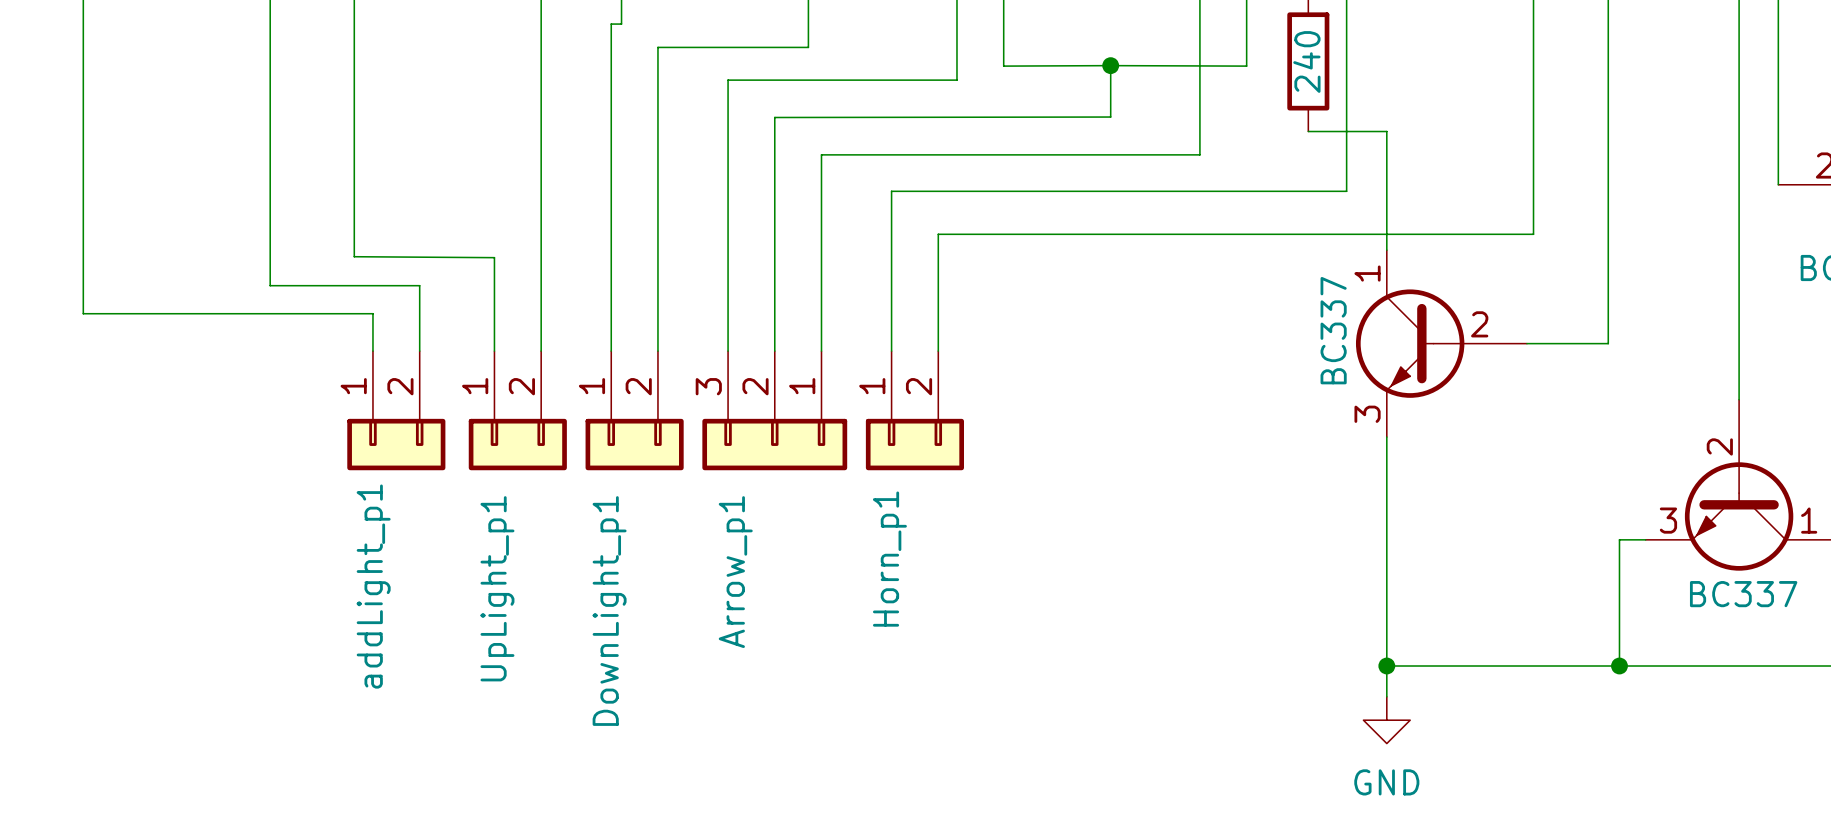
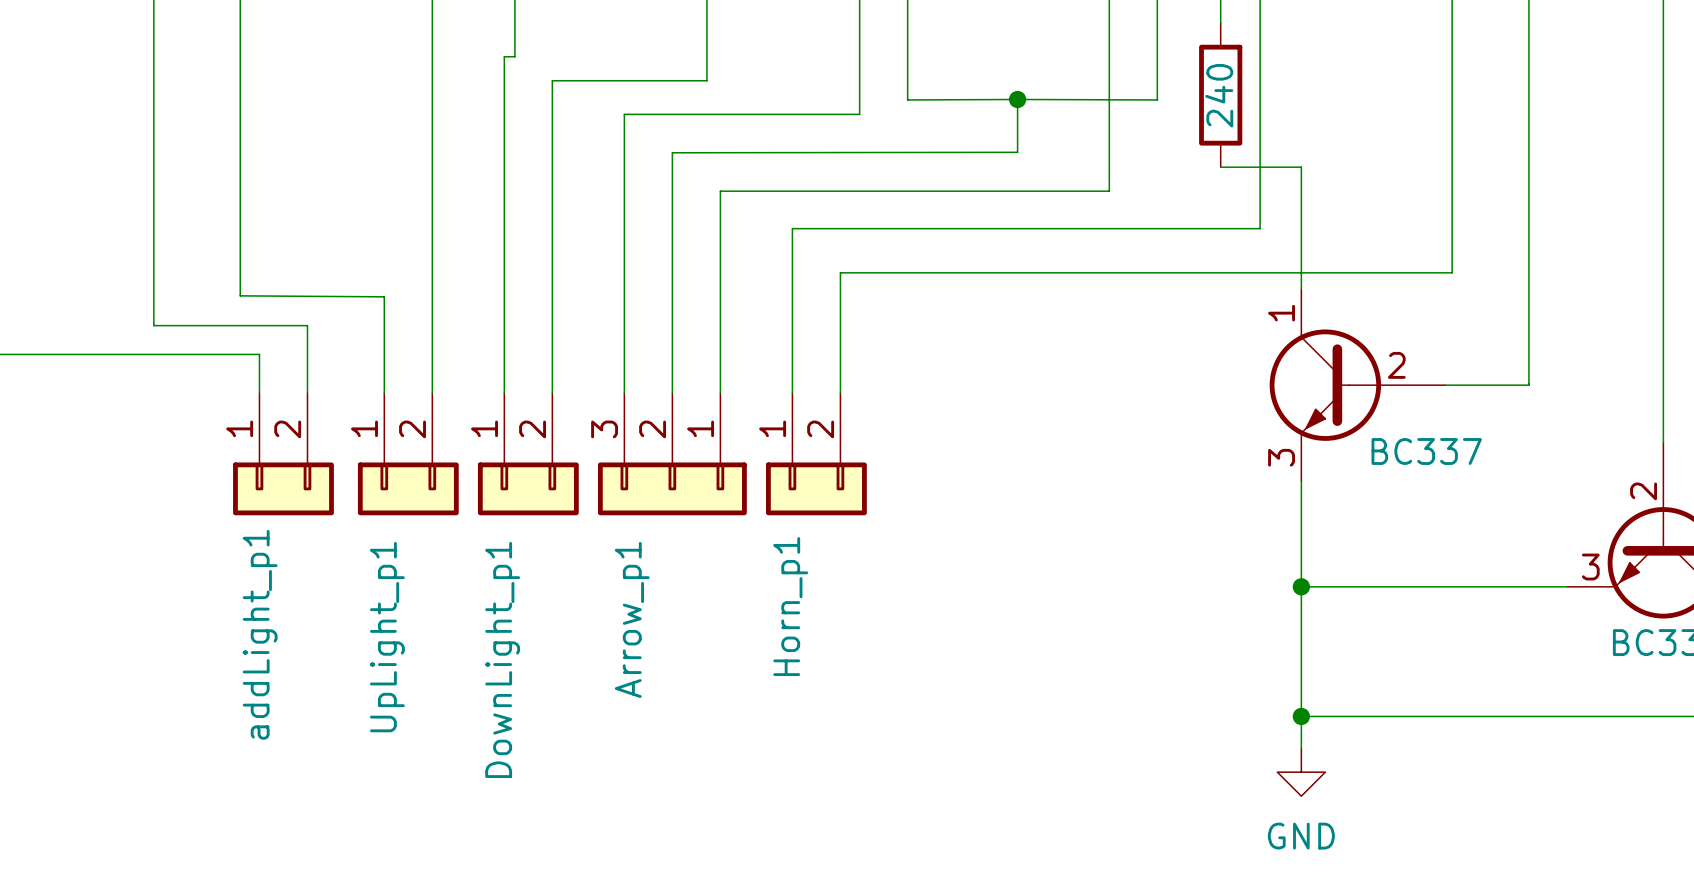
part value rotation: 0° (1333, 330) -> 90° clockwise (1426, 451)
part value position: BC337 (1333, 330) -> BC337 (1426, 451)
junction: none -> (1301, 586)
wire: (1619, 539) (1619, 666) -> (1540, 586) (1301, 586)
junction: (1619, 666) -> none

